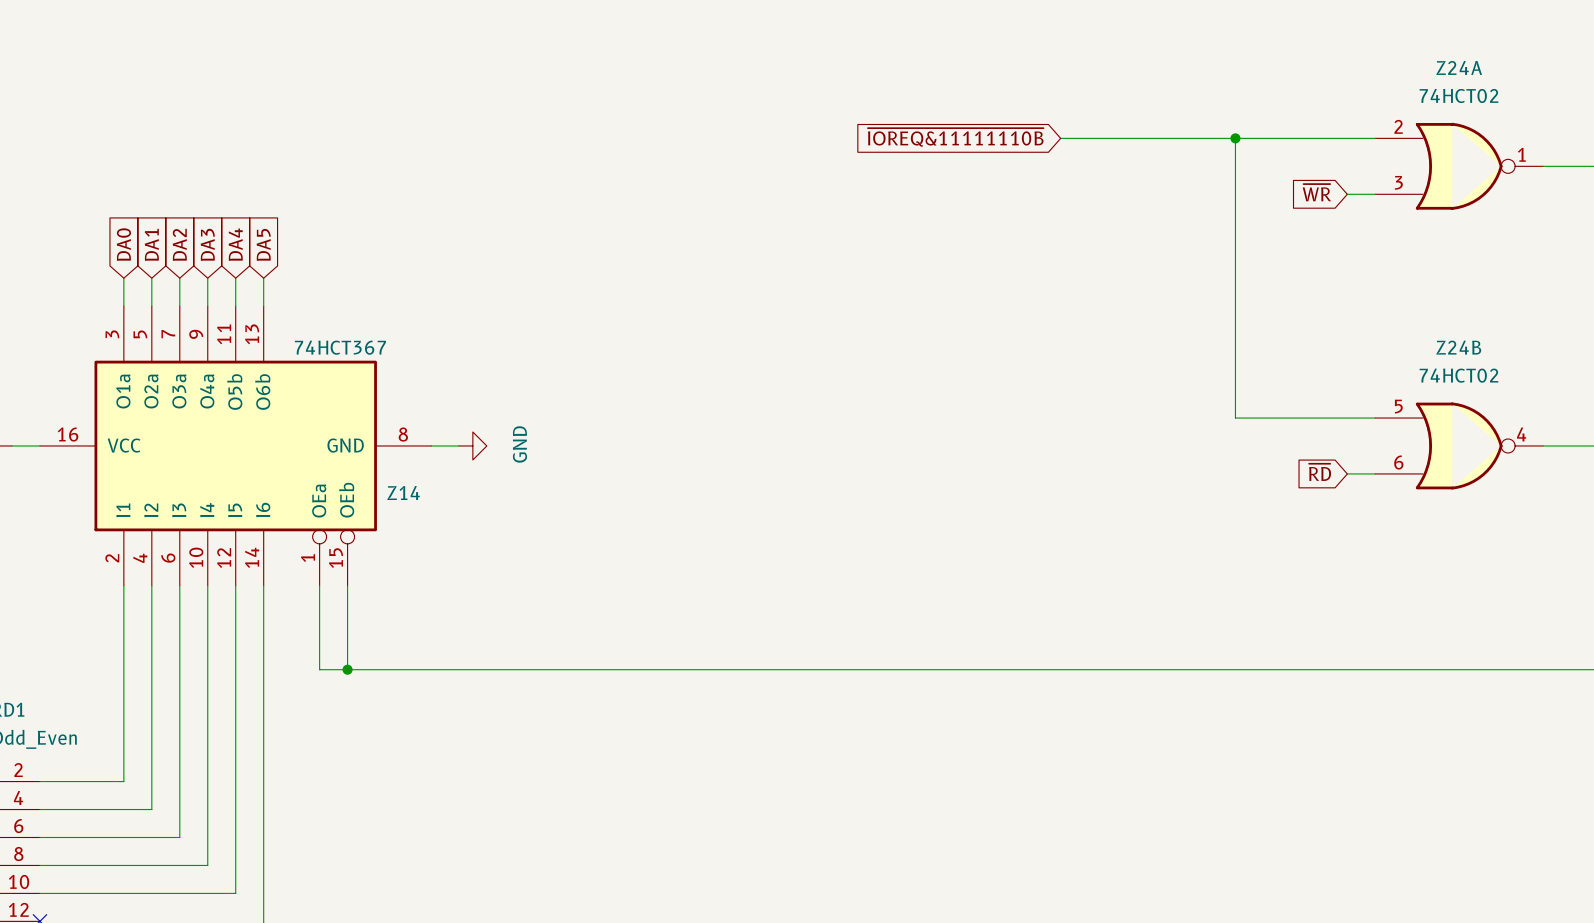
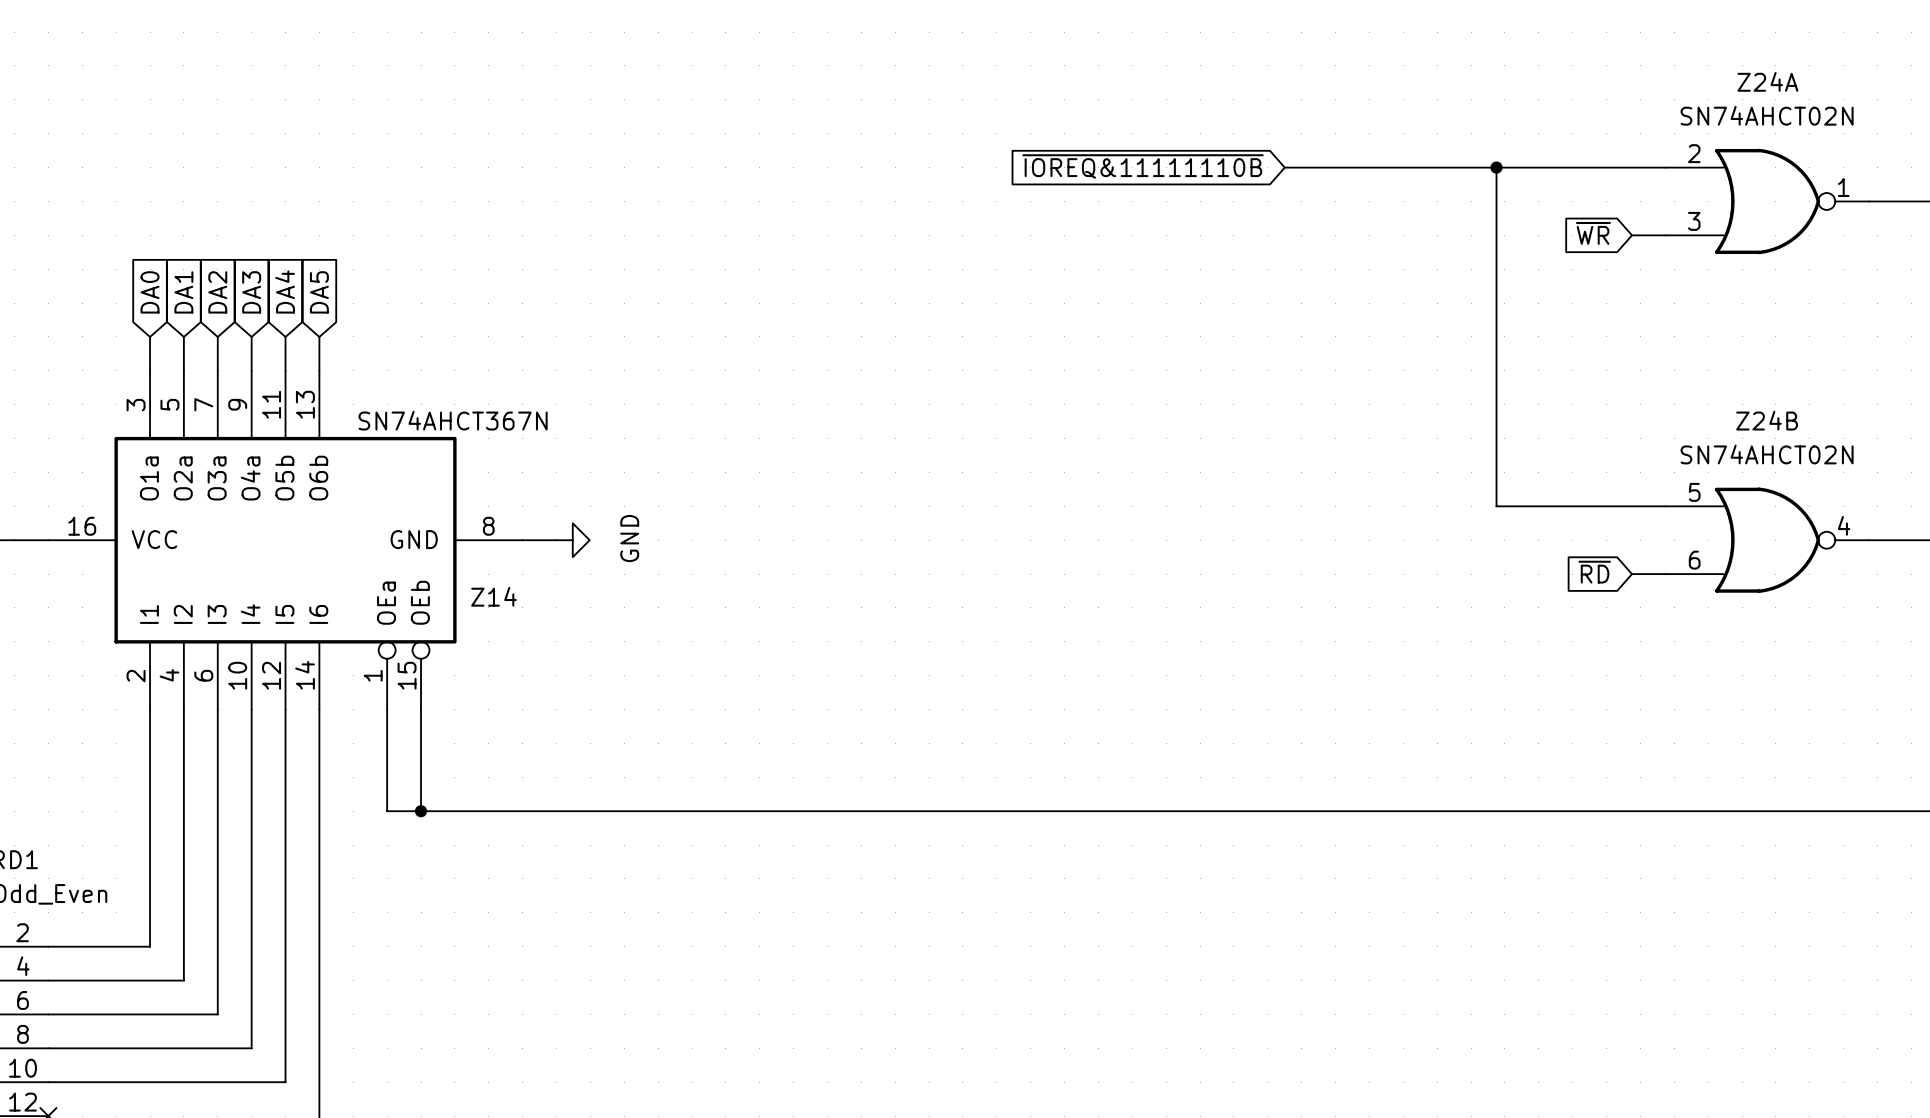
Z24A value: 74HCT02 (1458, 95) -> SN74AHCT02N (1767, 115)
Z14 value: 74HCT367 (340, 347) -> SN74AHCT367N (453, 420)
Z24B value: 74HCT02 (1458, 375) -> SN74AHCT02N (1767, 454)

